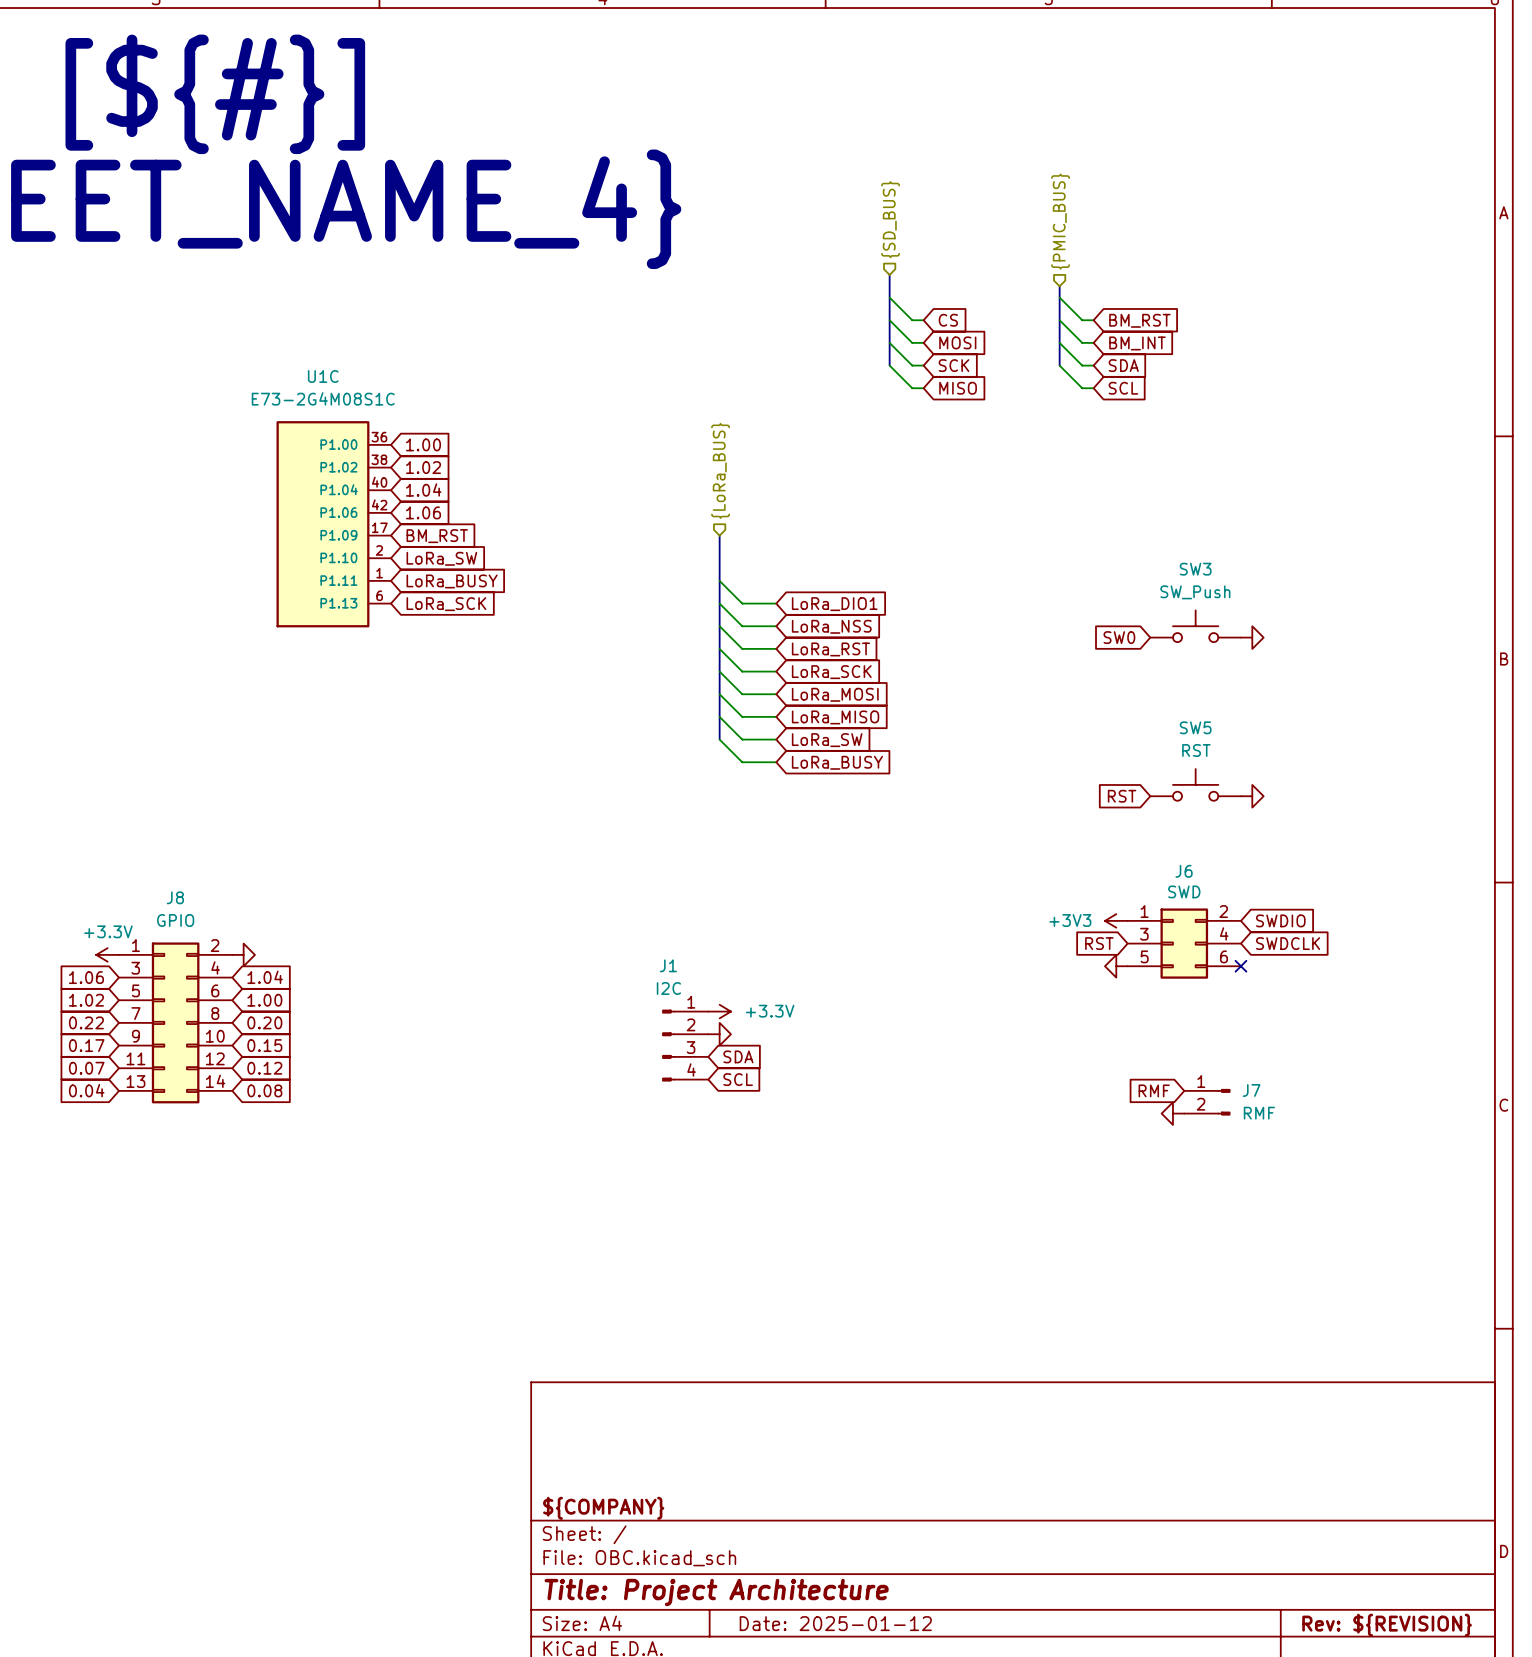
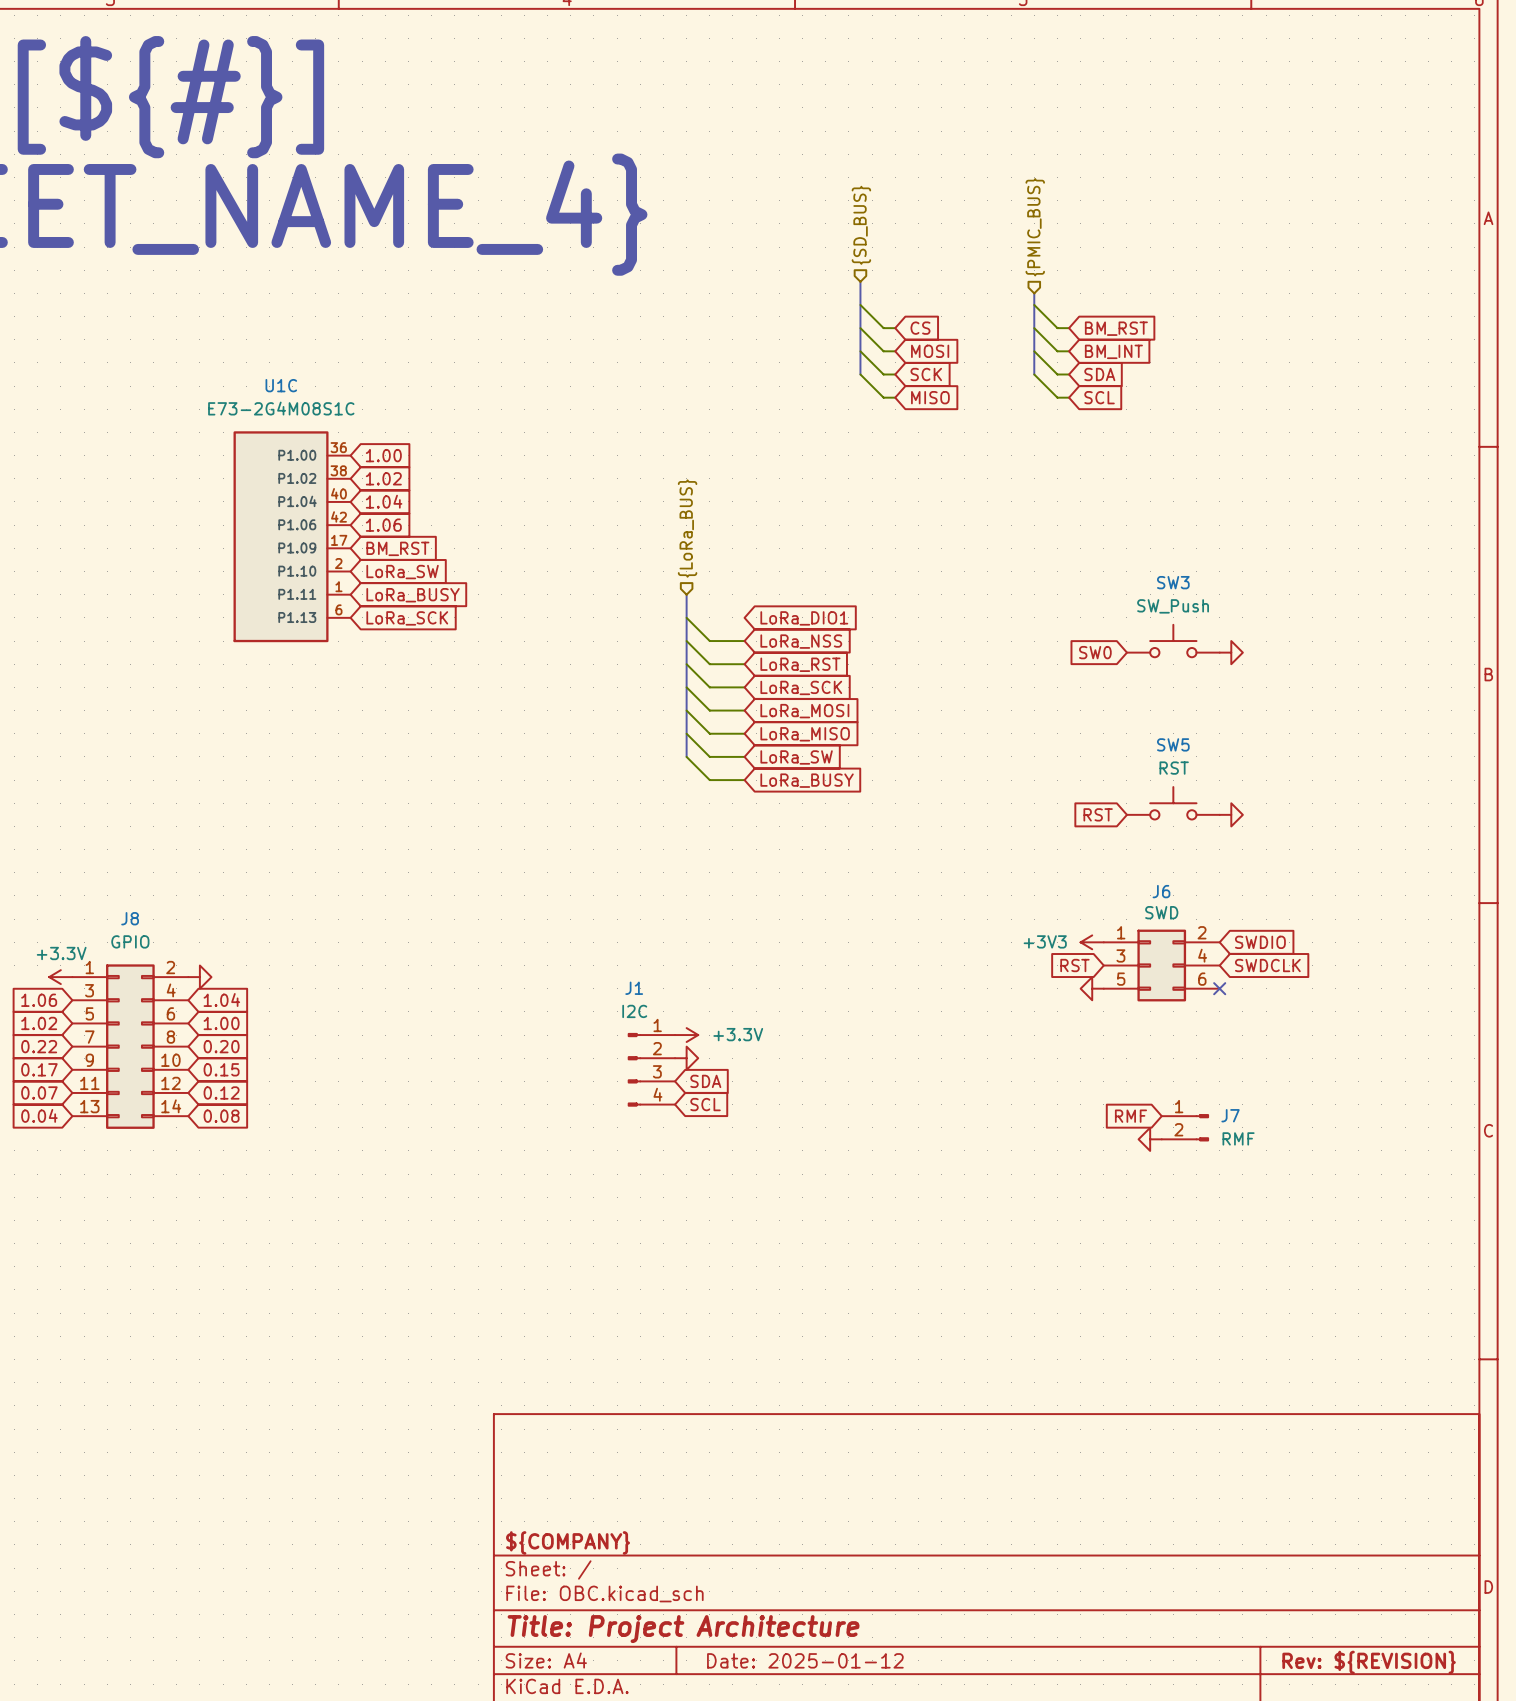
hierarchical label position: {LoRa_BUS} (720, 470) -> {LoRa_BUS} (687, 528)
bus: (719, 535) (719, 580) -> none
wire: (719, 580) (742, 603) (776, 603) -> none

